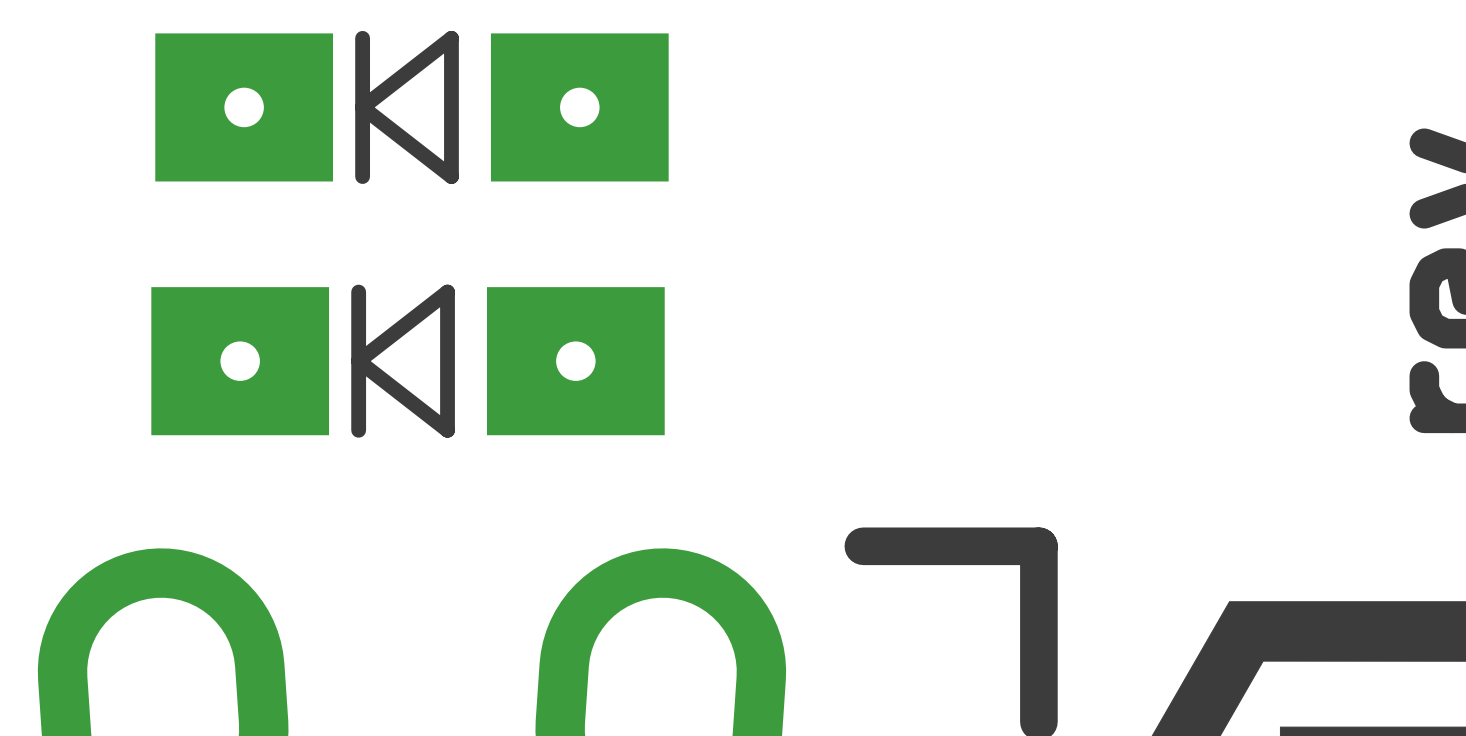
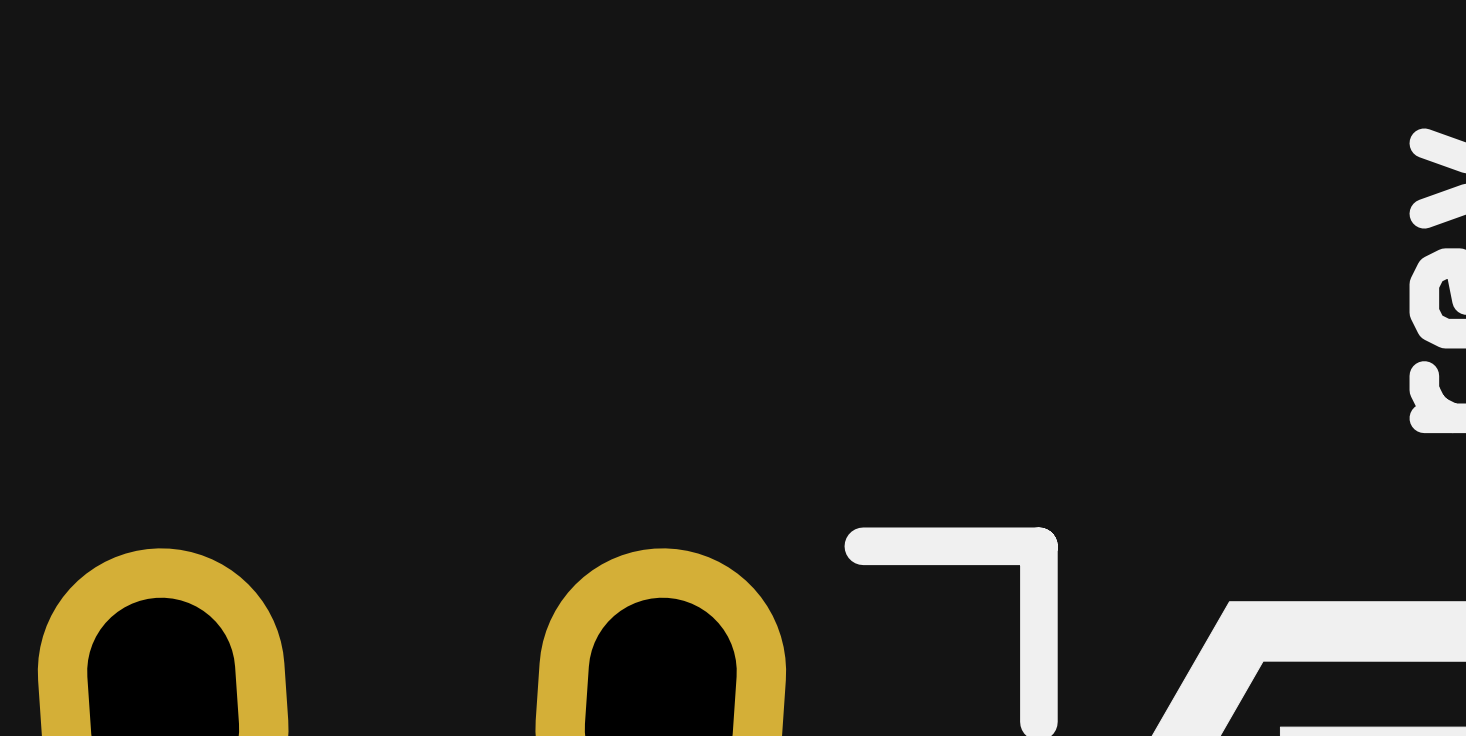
part: (411, 107) -> none
part: (408, 361) -> none

